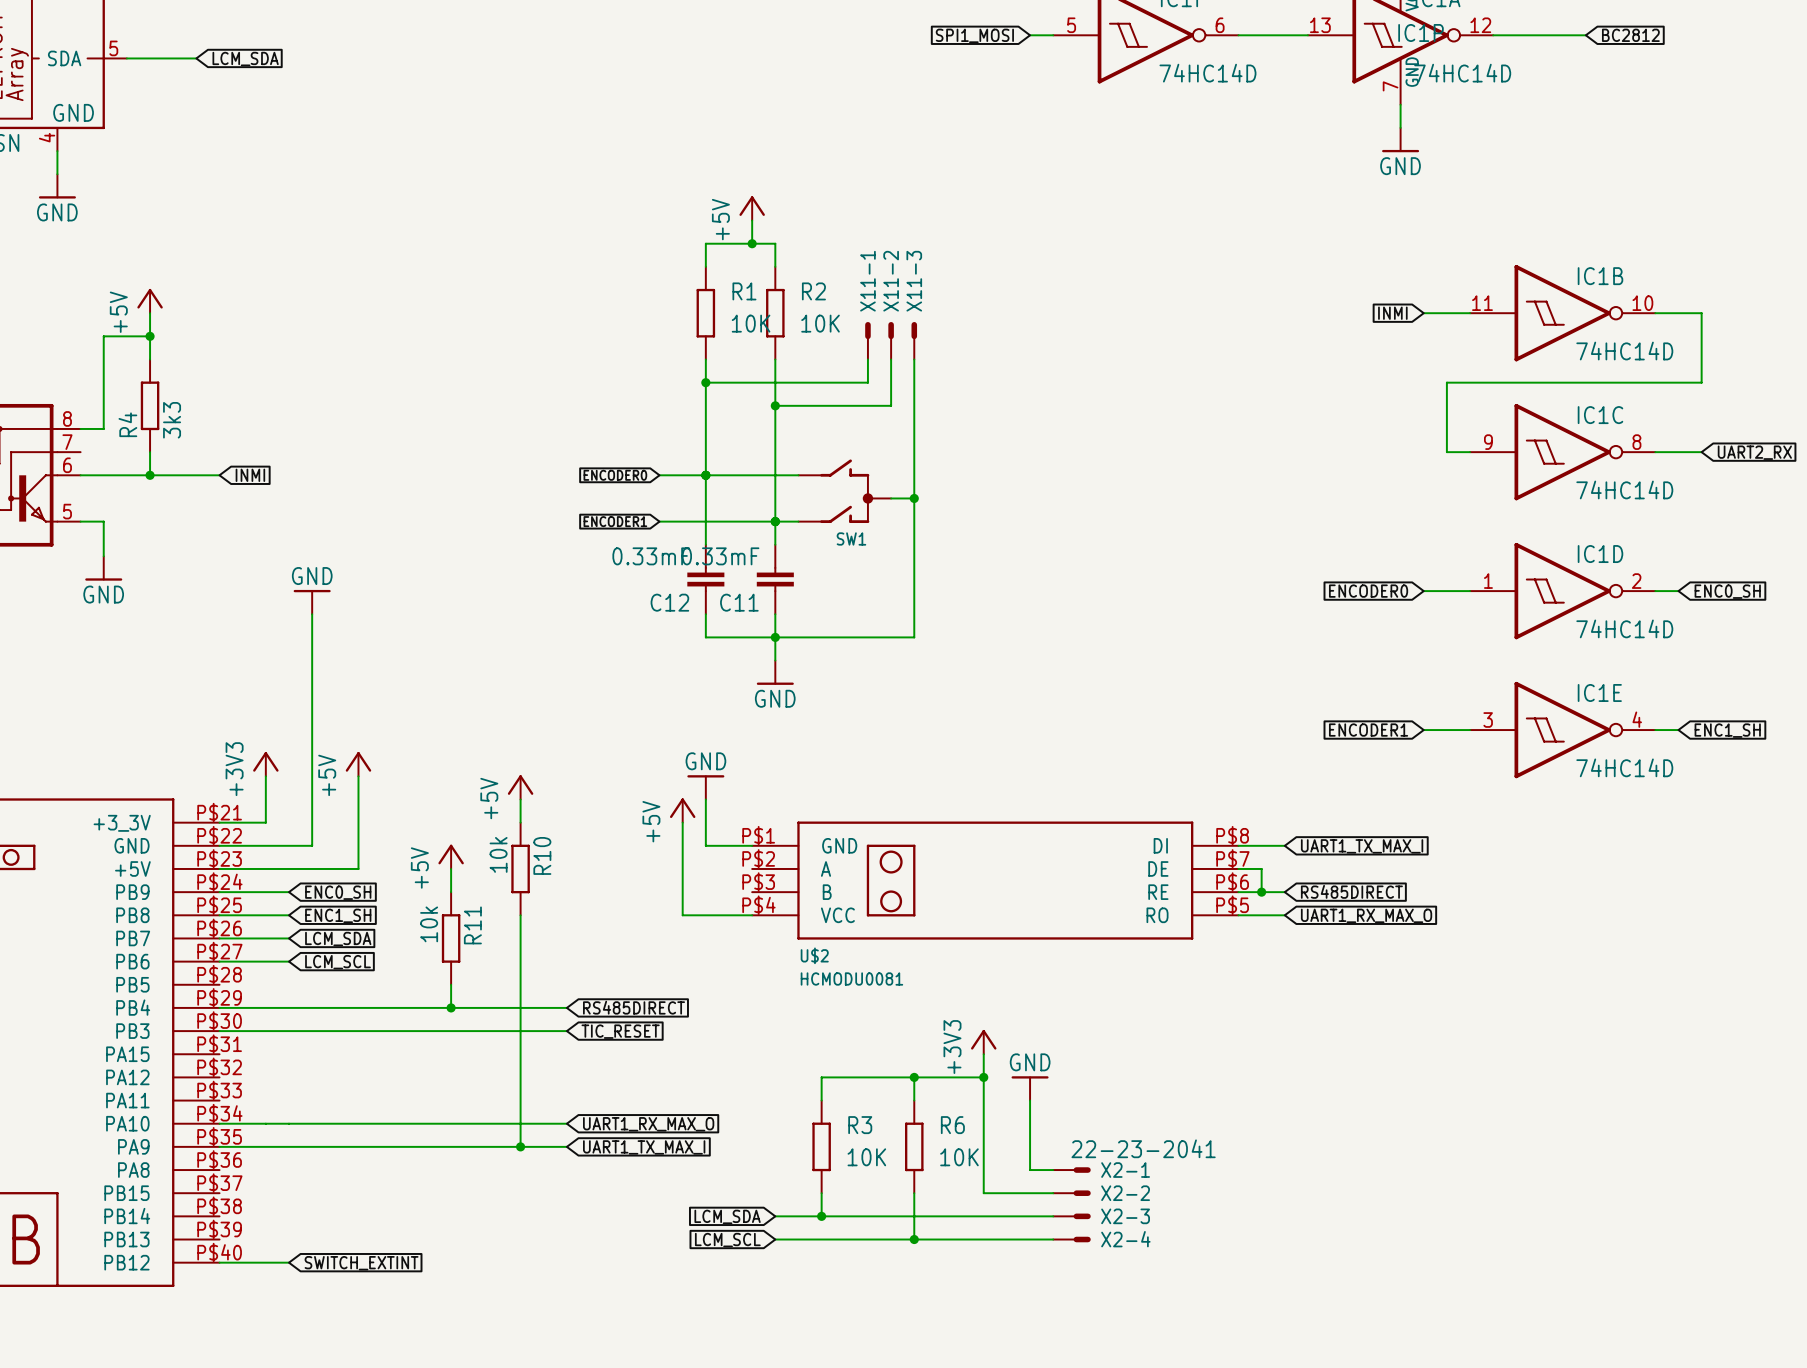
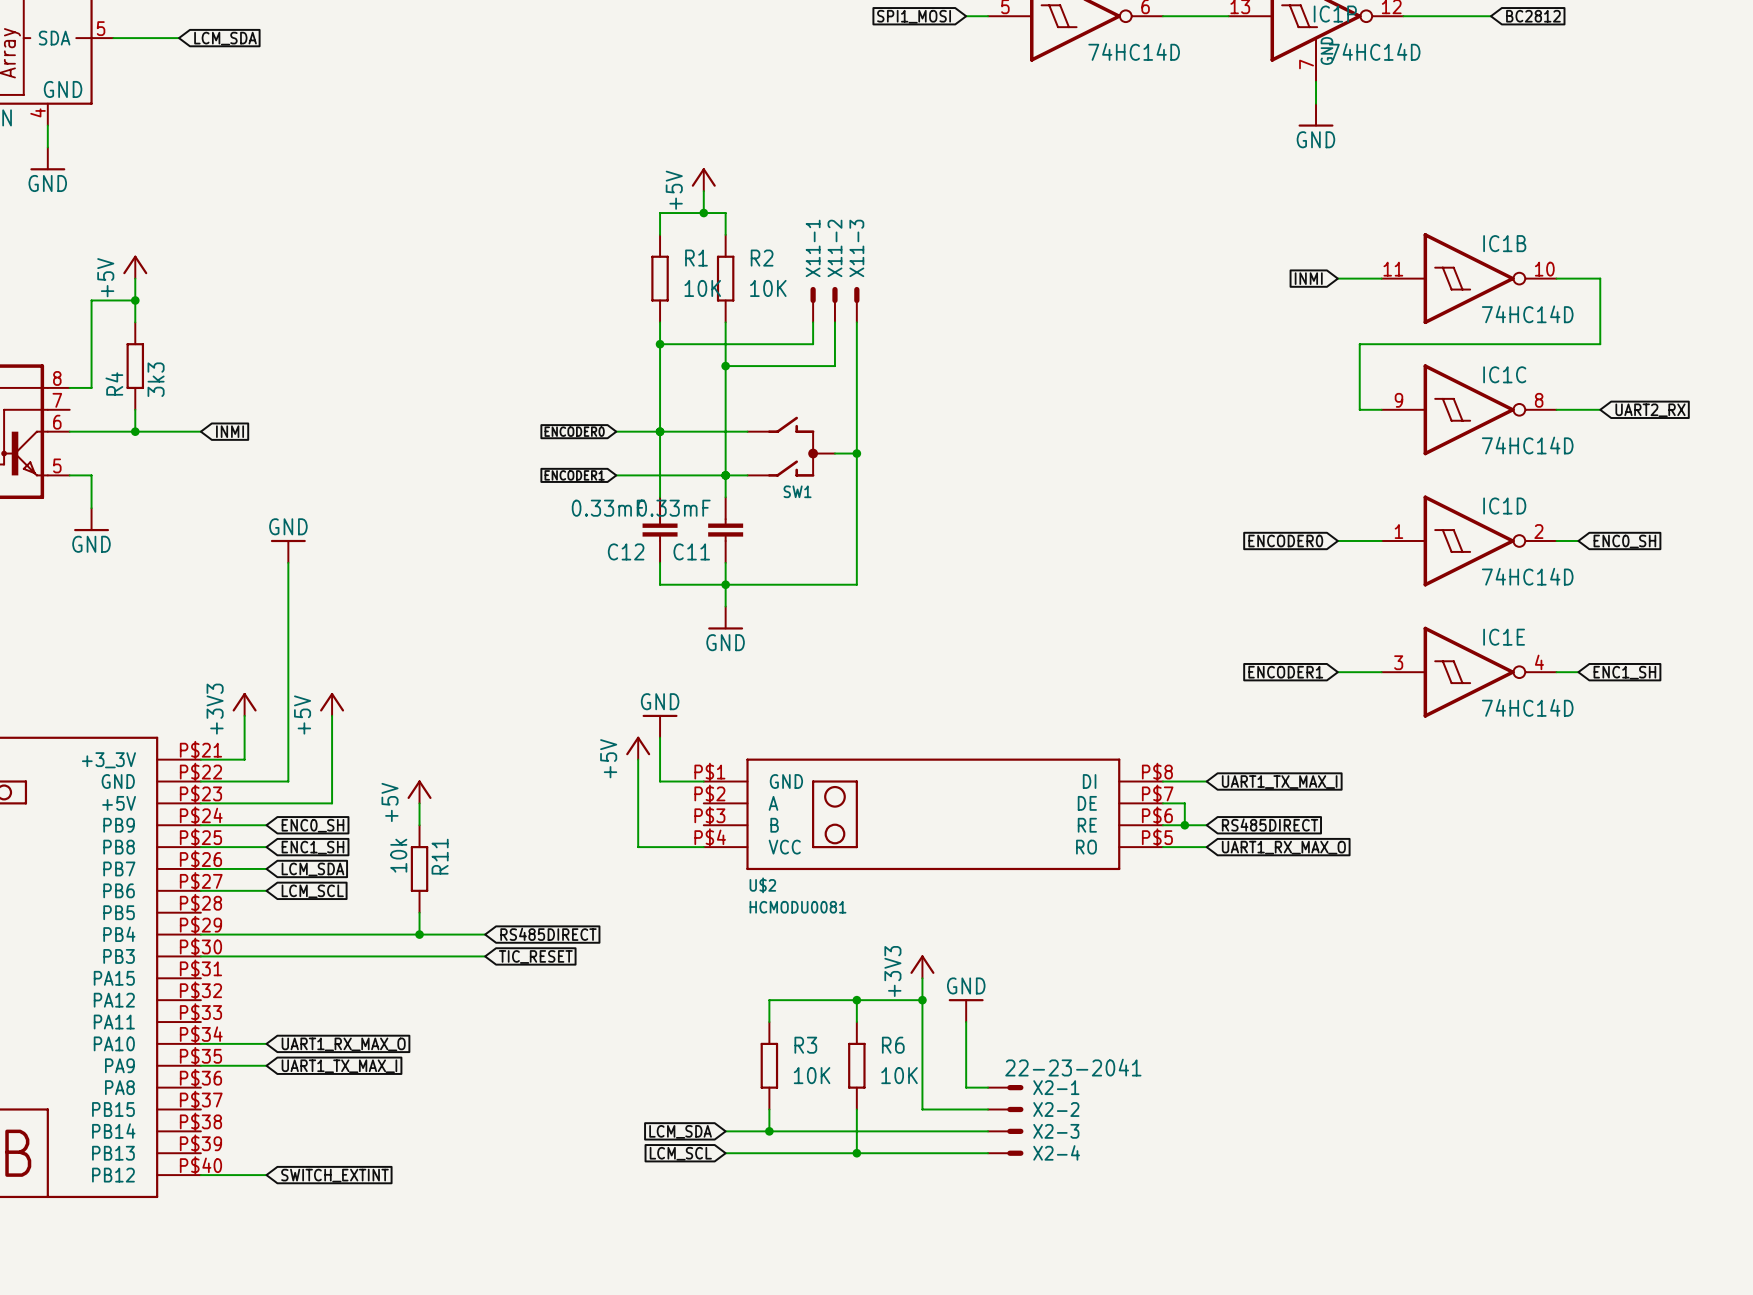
power symbol: +5V (520, 787) -> none
wire: (520, 799) (520, 822) -> none
R10: 10k (520, 868) -> none
wire: (520, 915) (520, 1146) -> none
wire: (520, 1007) (566, 1007) -> none
global label position: RS485DIRECT (634, 1007) -> RS485DIRECT (548, 934)
wire: (520, 1031) (566, 1031) -> none
global label position: TIC_RESET (620, 1031) -> TIC_RESET (535, 956)
wire: (289, 1123) (566, 1123) -> none
global label: none -> UART1_RX_MAX_O (343, 1044)
global label: UART1_RX_MAX_O (648, 1124) -> none
wire: (289, 1146) (566, 1146) -> none
junction: (520, 1146) -> none
global label: none -> UART1_TX_MAX_I (339, 1066)
global label: UART1_TX_MAX_I (644, 1147) -> none

